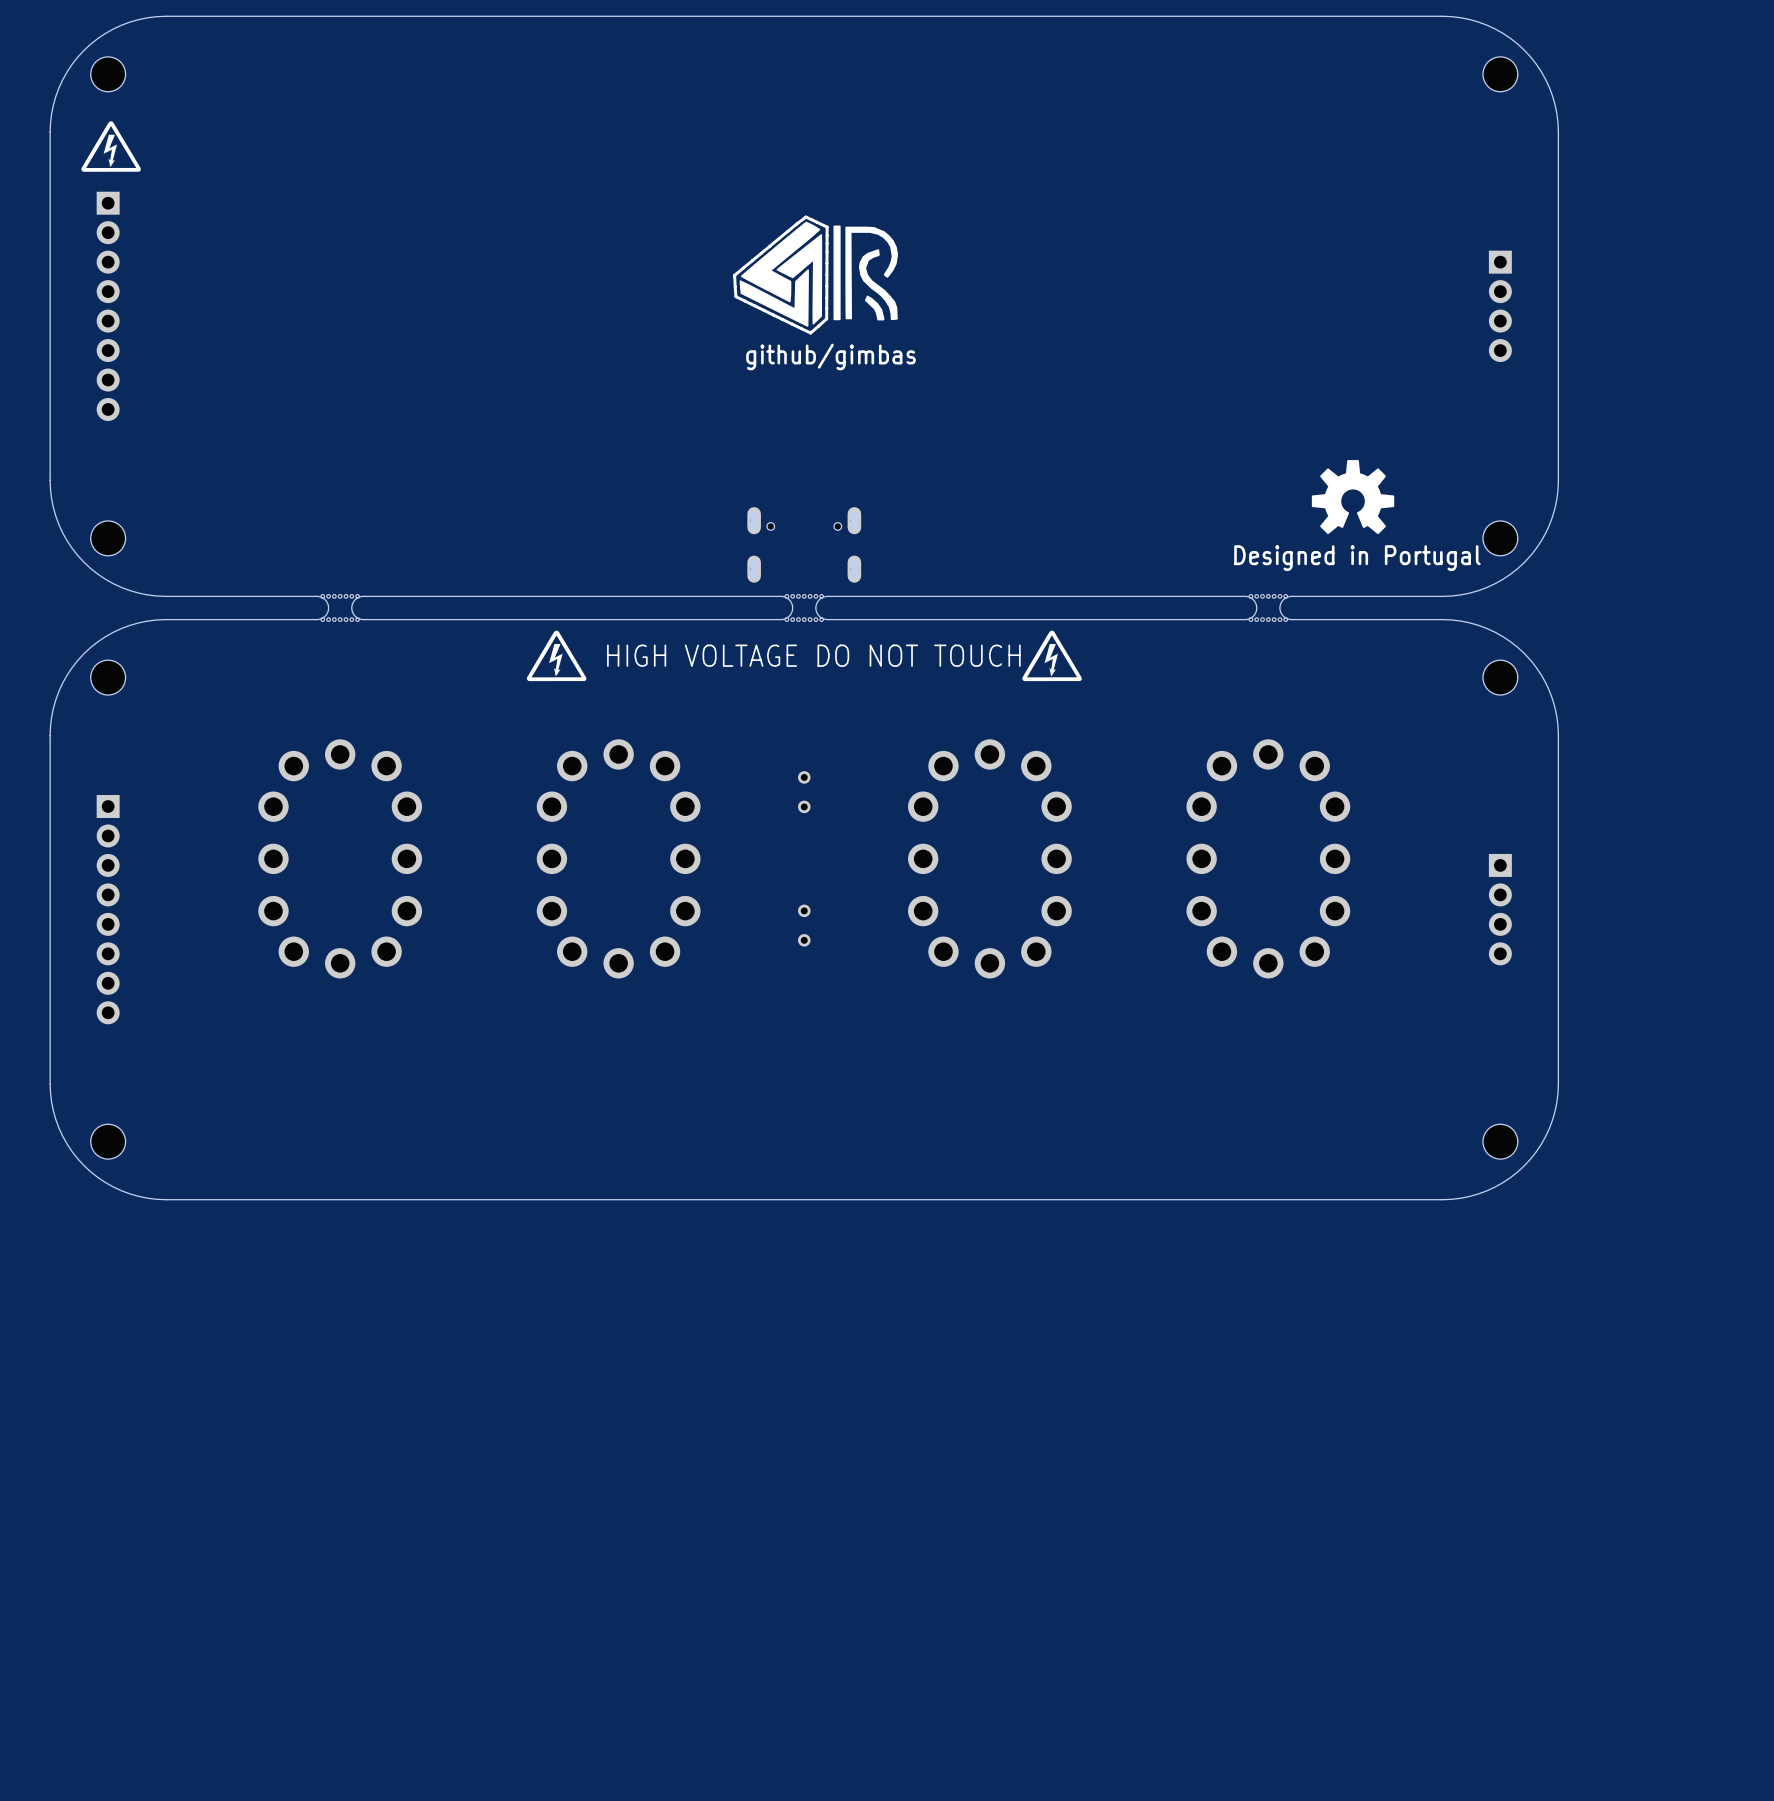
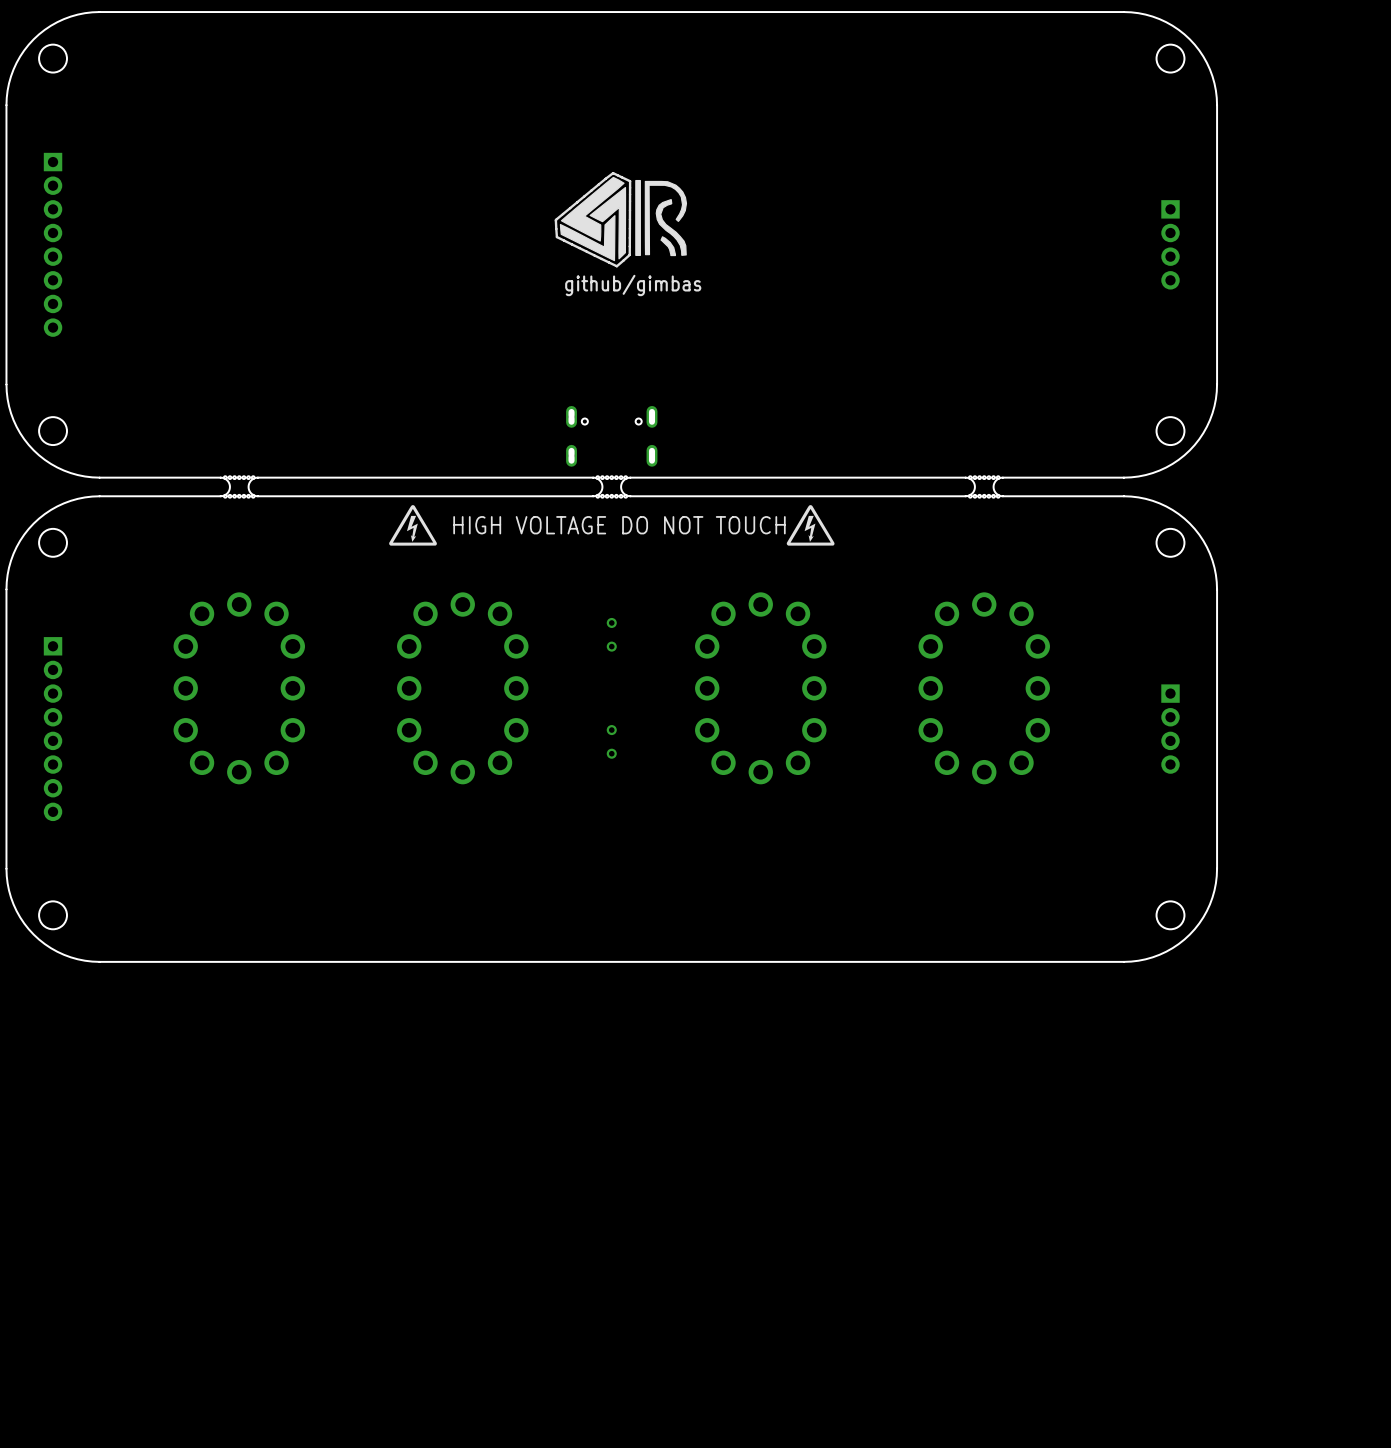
drawing: [81, 121, 141, 172] -> none
drawing: [1311, 460, 1395, 535] -> none
text: Designed in Portugal (1357, 558) -> none

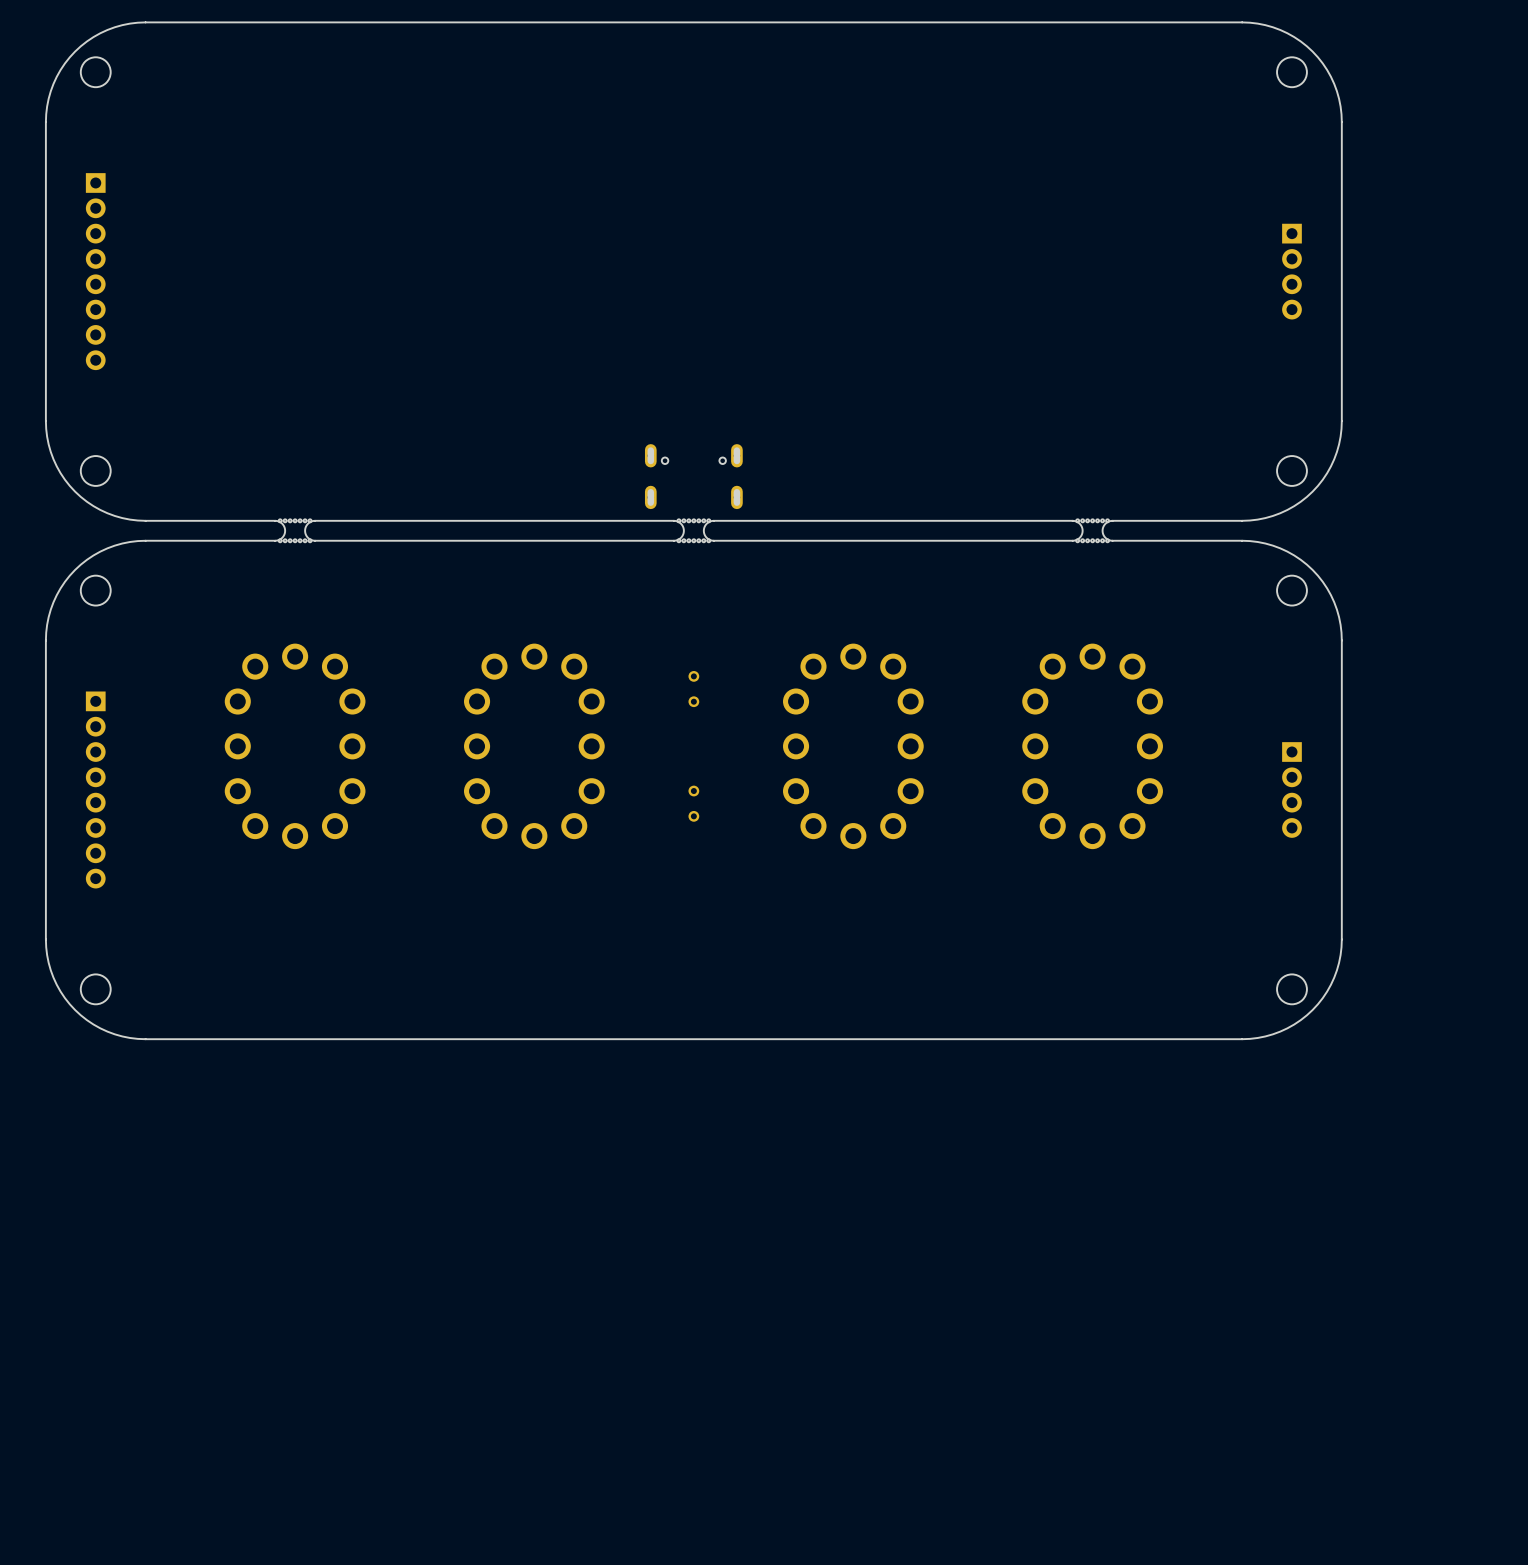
drawing: [554, 171, 688, 268] -> none
text: github/gimbas (633, 285) -> none
drawing: [389, 505, 437, 546] -> none
drawing: [786, 505, 835, 546] -> none
text: HIGH VOLTAGE DO NOT TOUCH (619, 525) -> none

